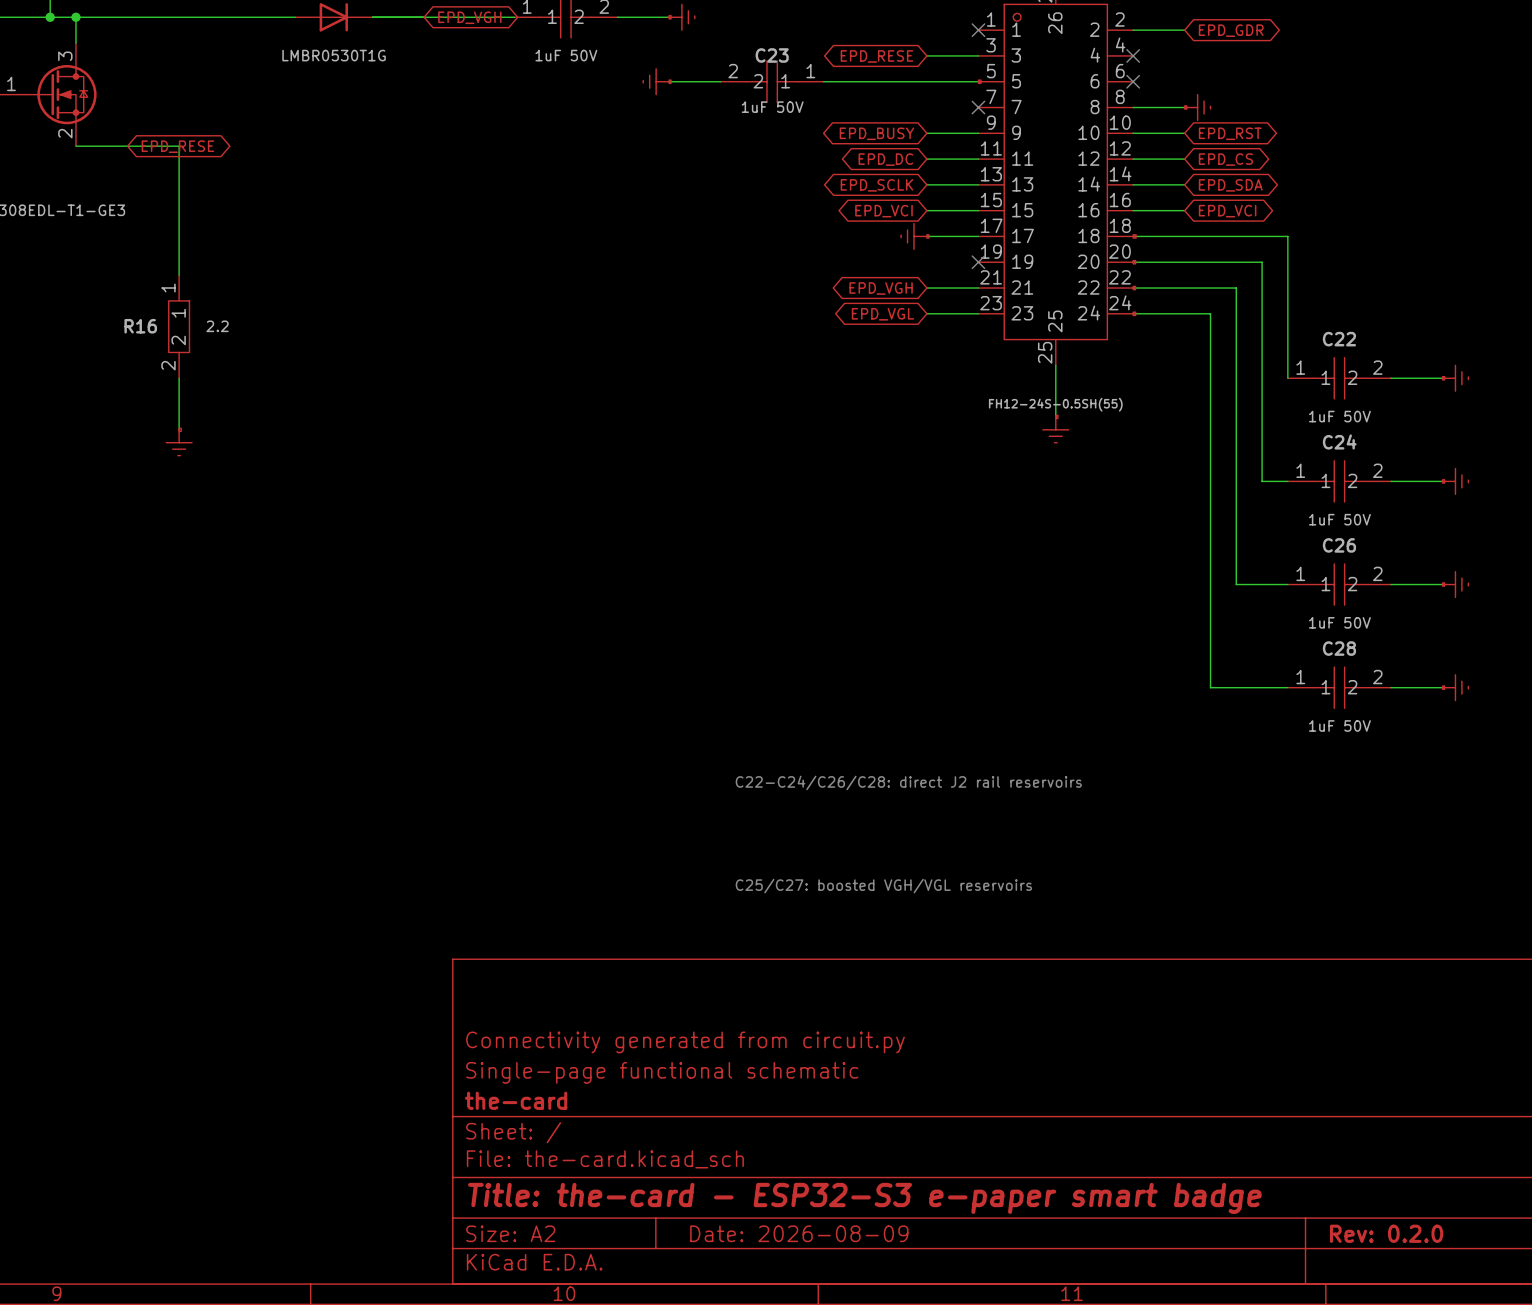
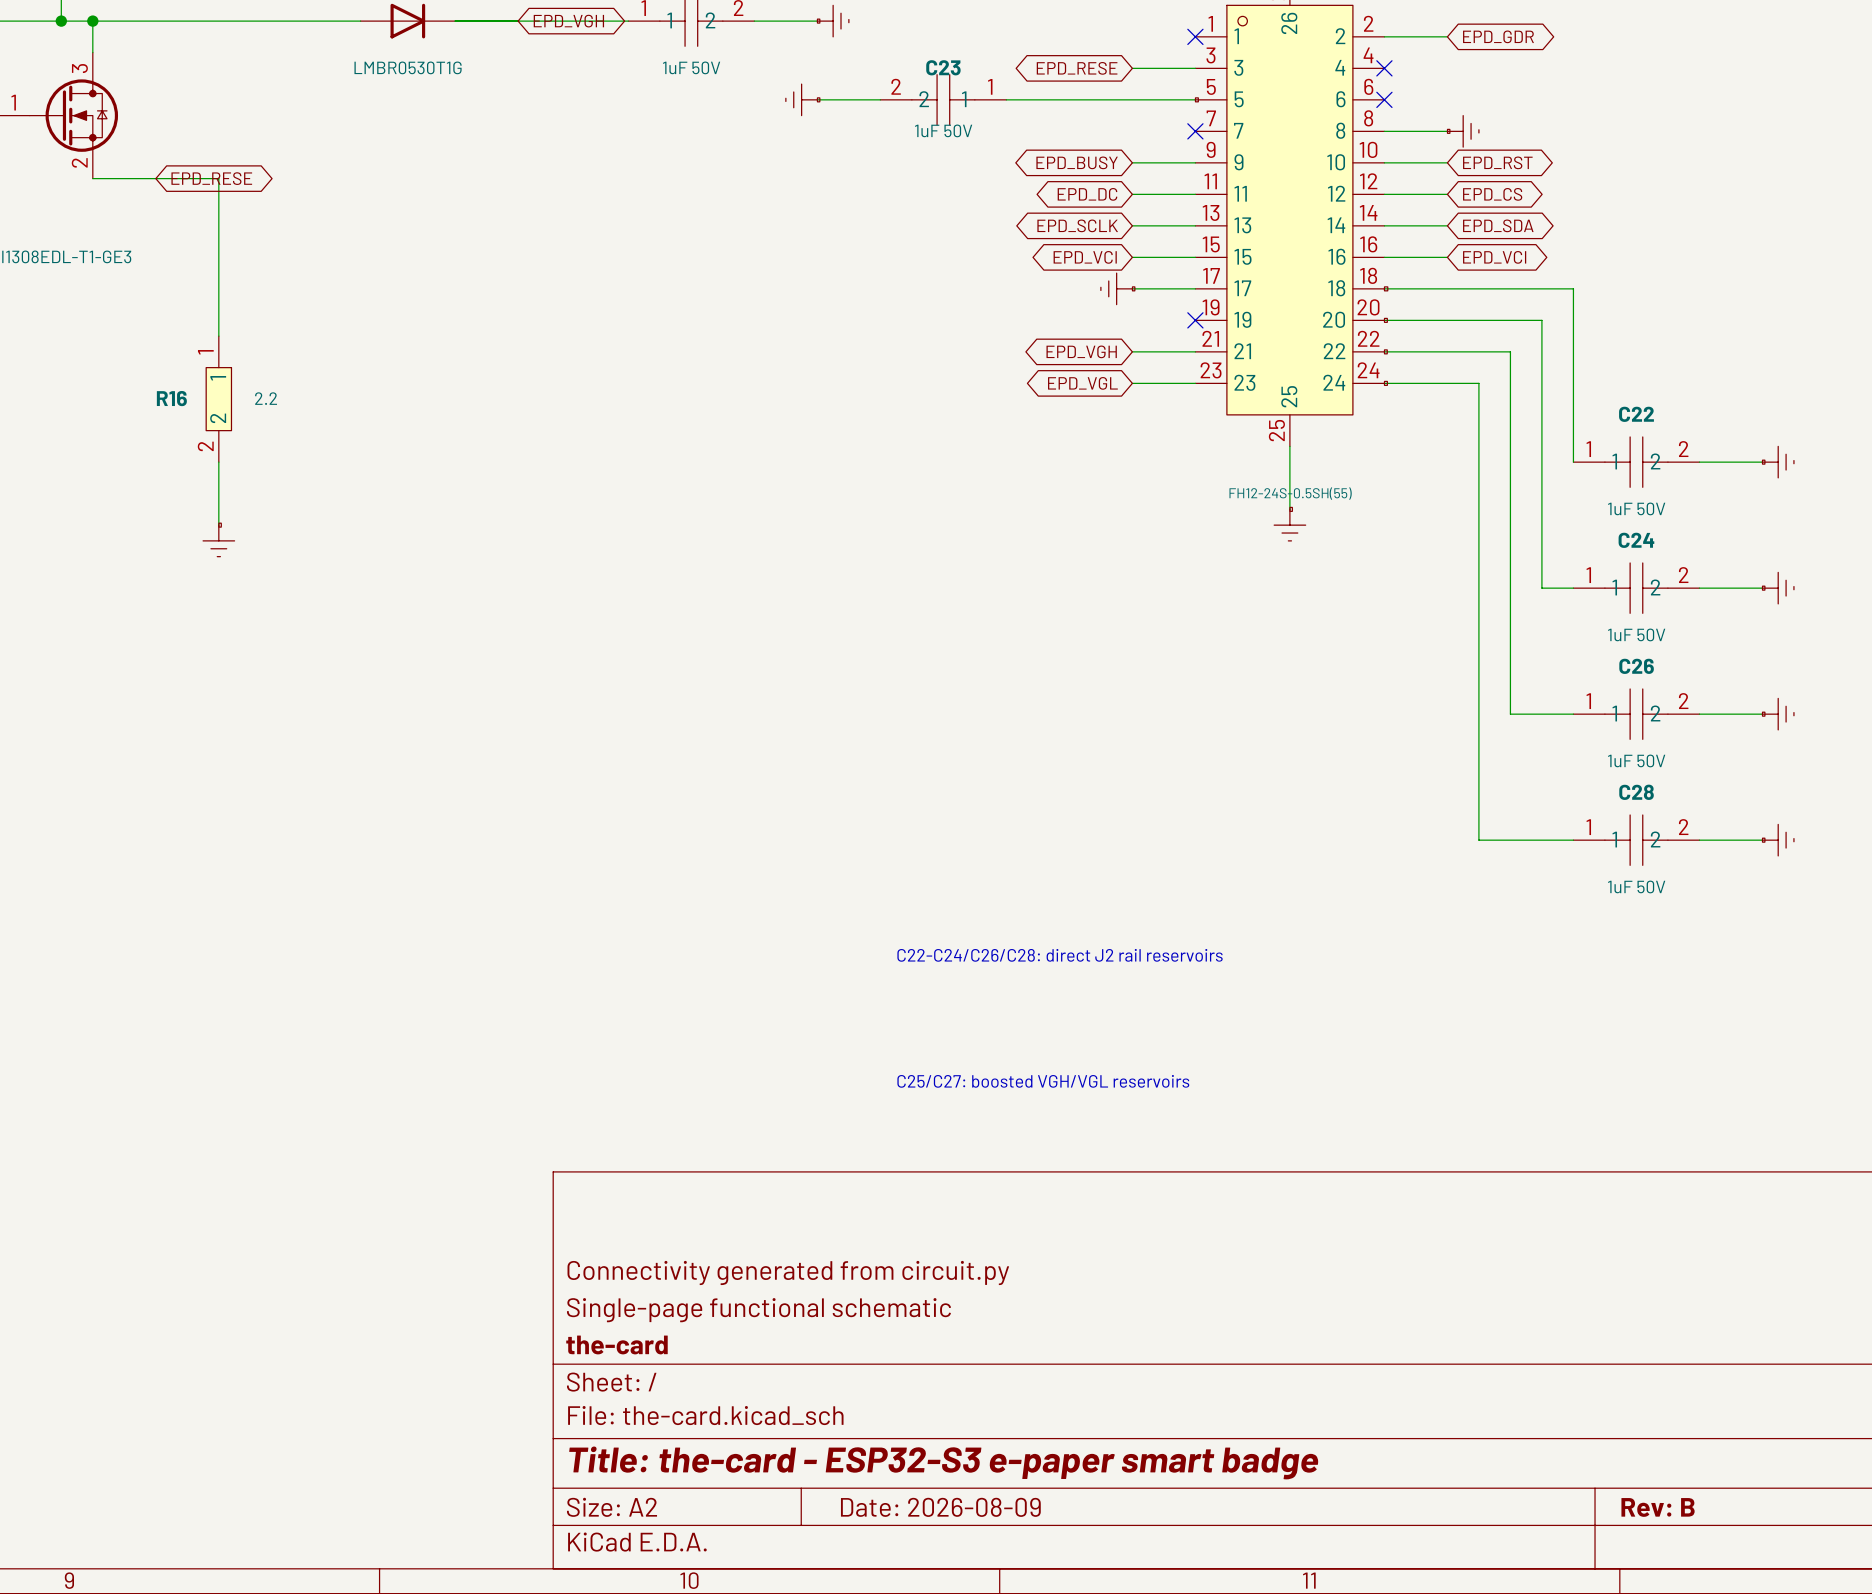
title block: Rev: 0.2.0 (1386, 1233) -> Rev: B (1658, 1507)

